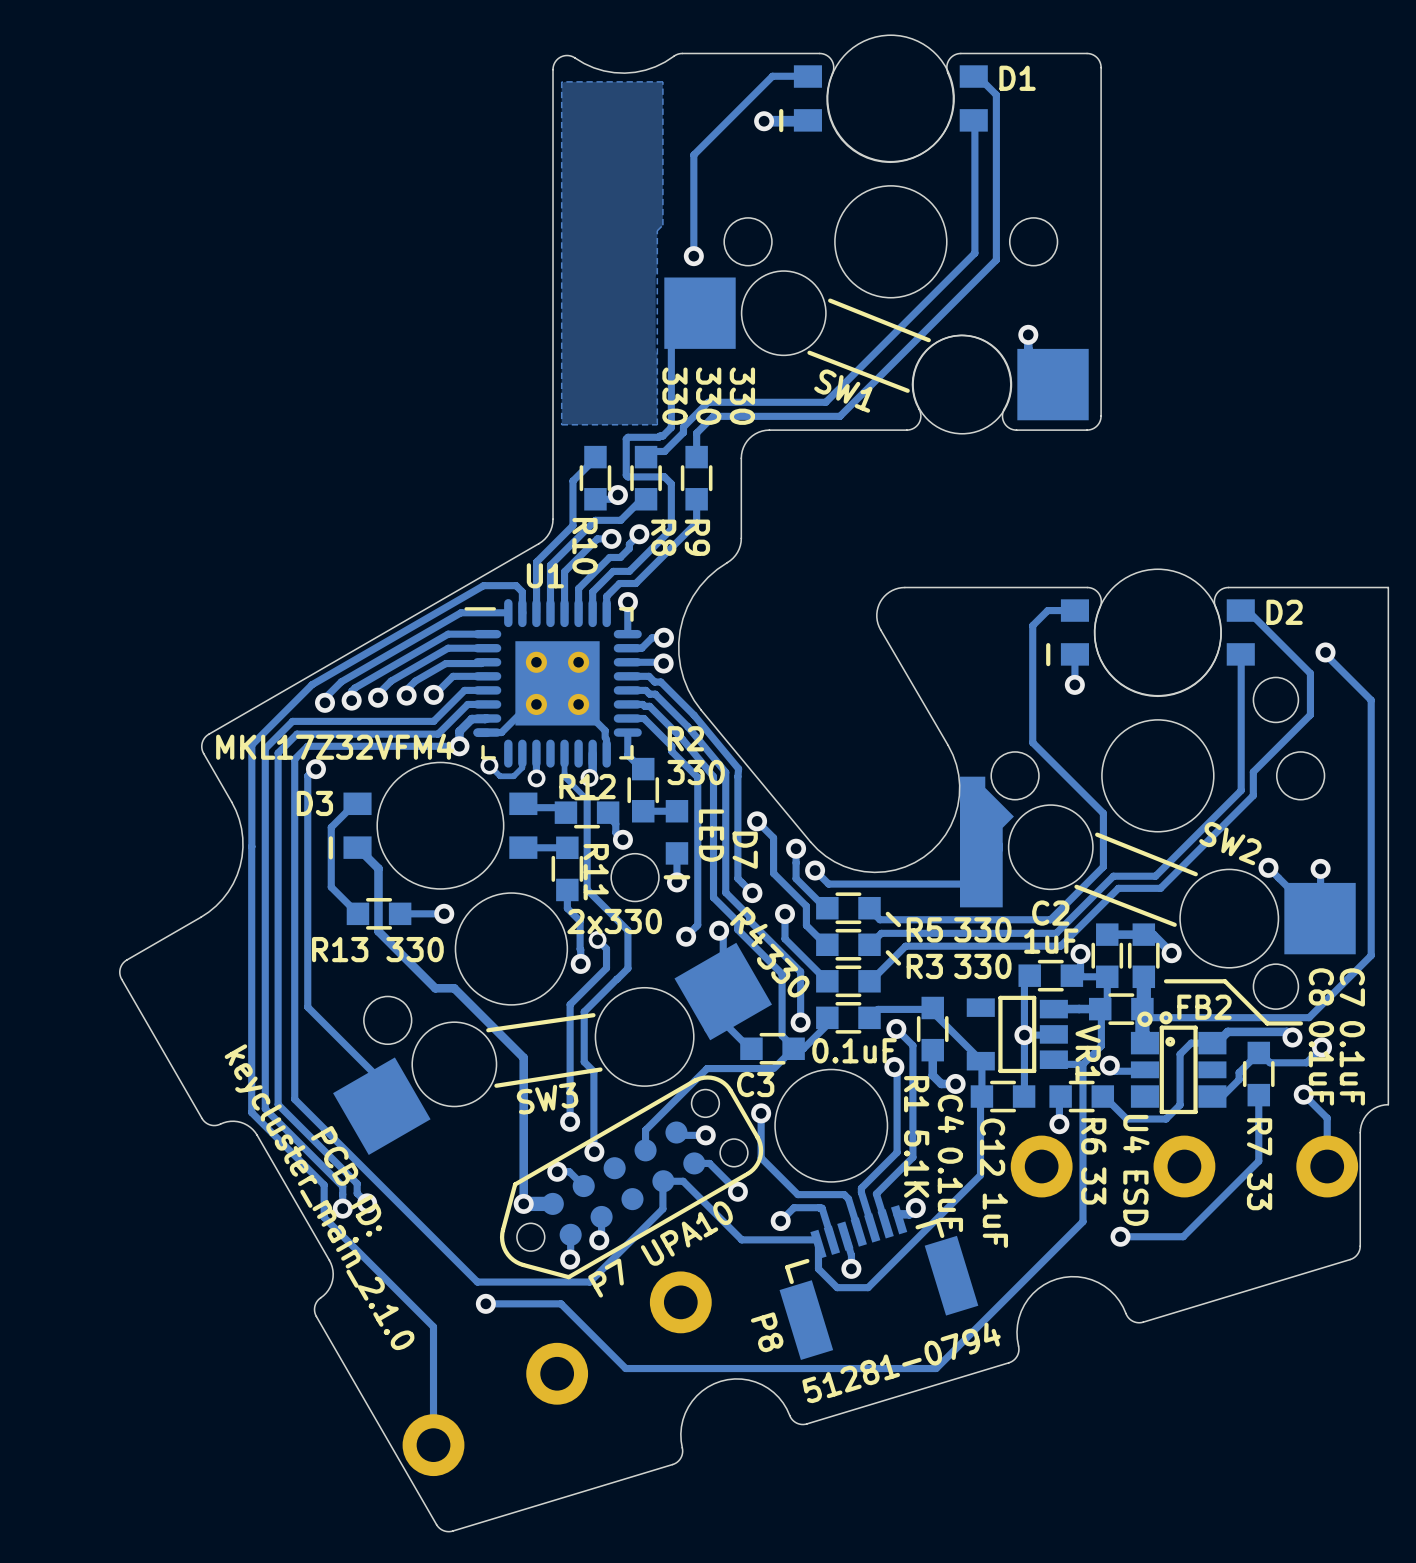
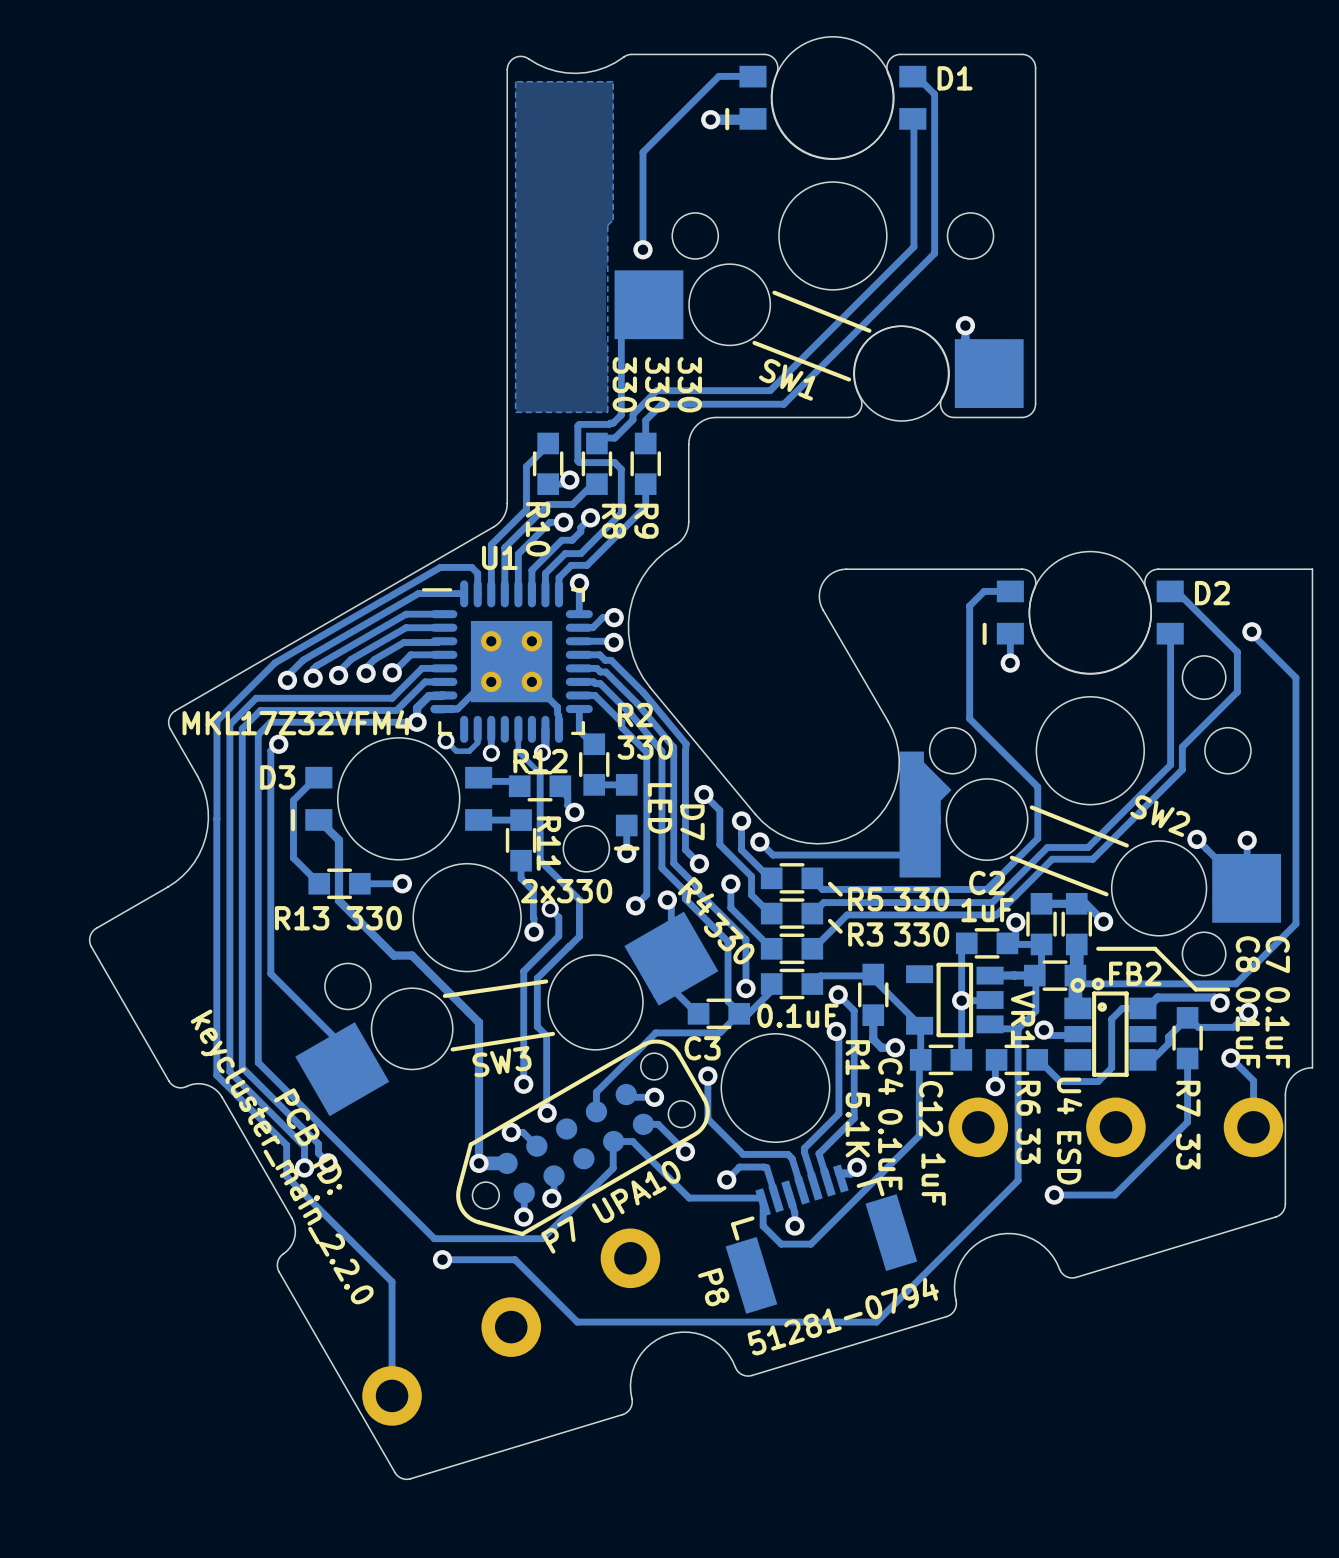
text: keycluster_main_2.1.0 (319, 1197) -> keycluster_main_2.2.0 (282, 1156)

